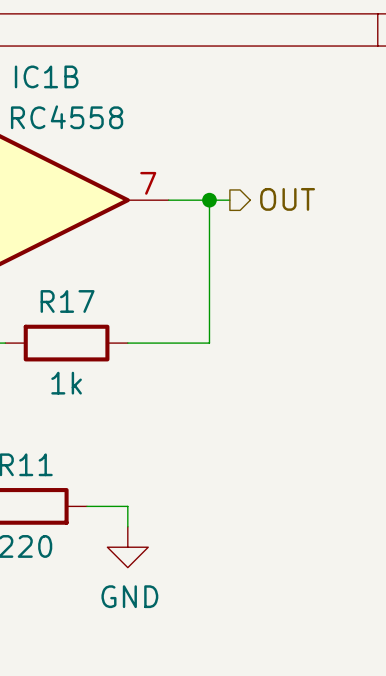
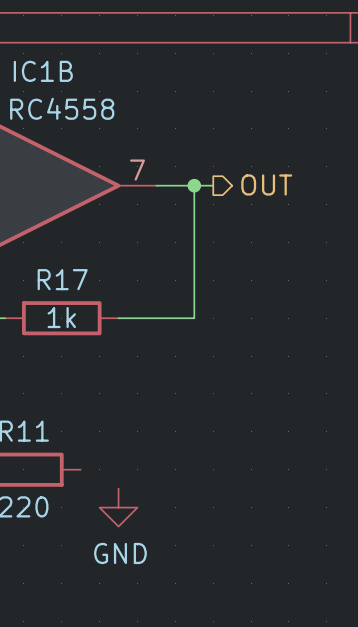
R17 value position: 1k (66, 383) -> 1k (61, 317)
wire: (86, 506) (127, 506) (127, 526) -> none

